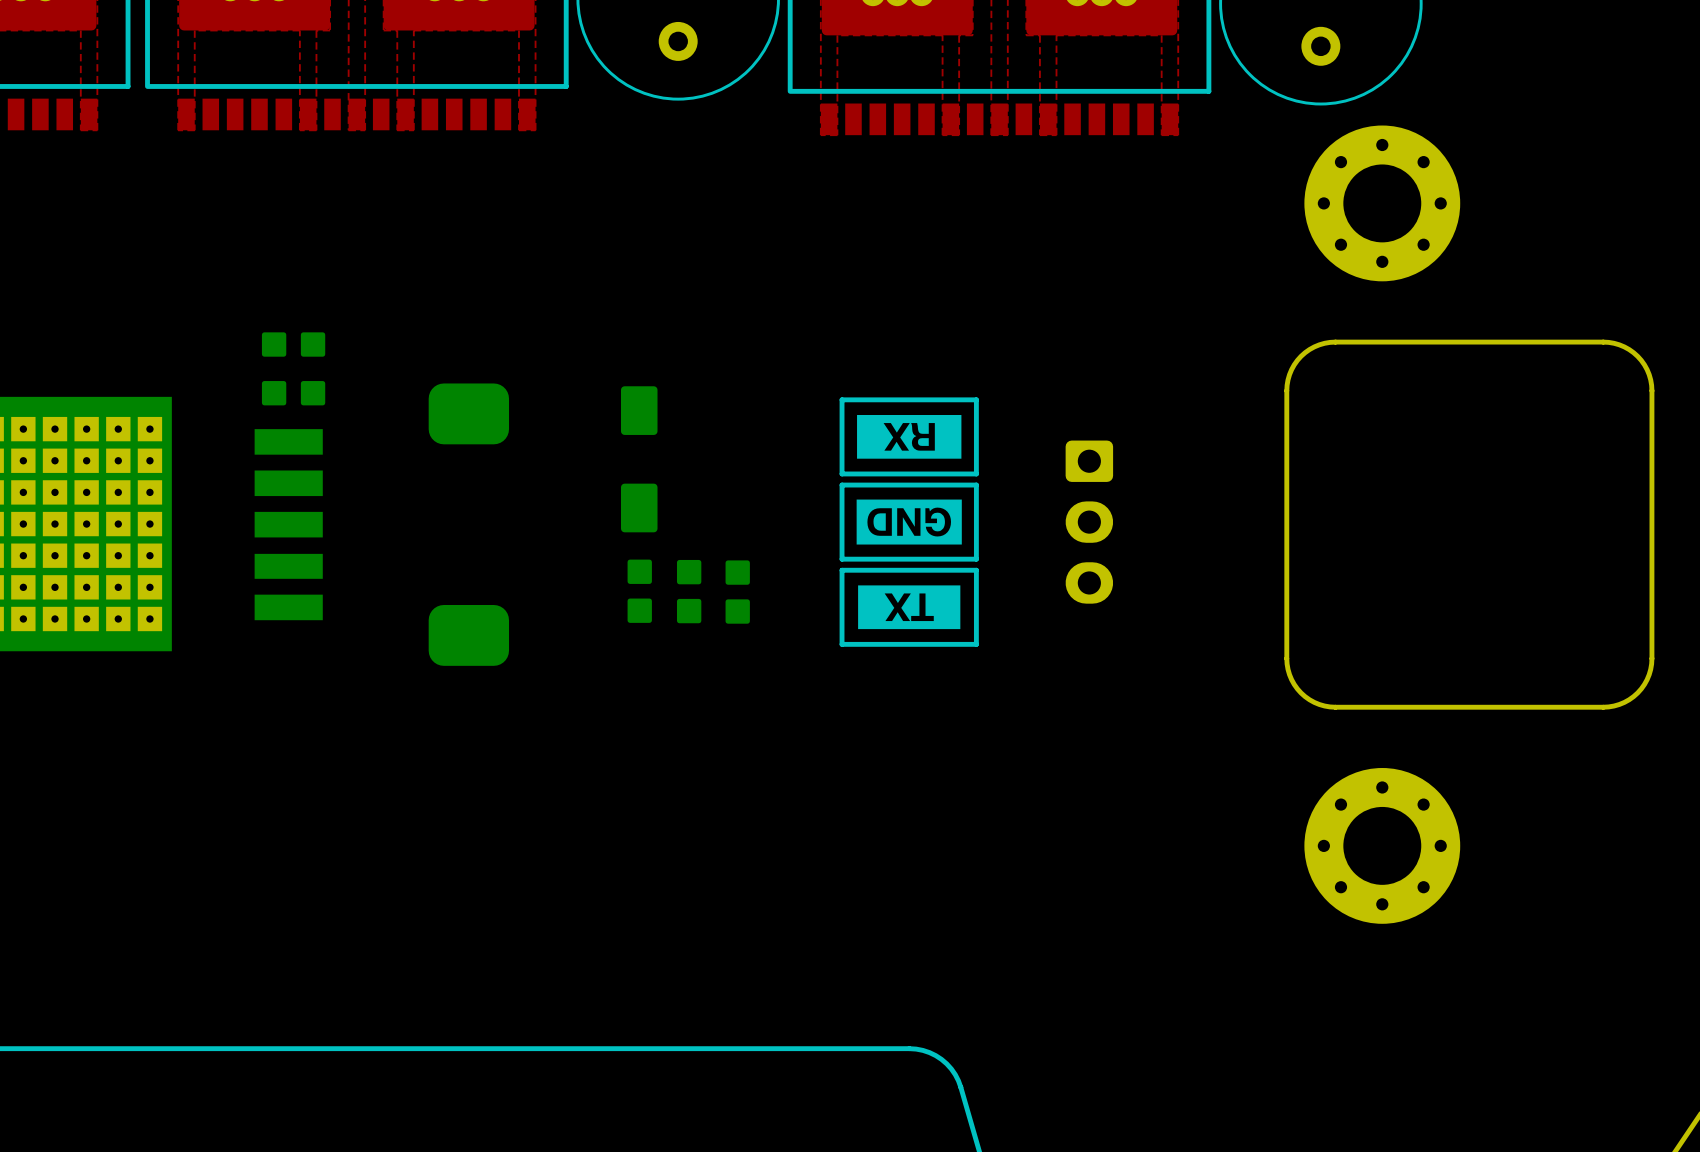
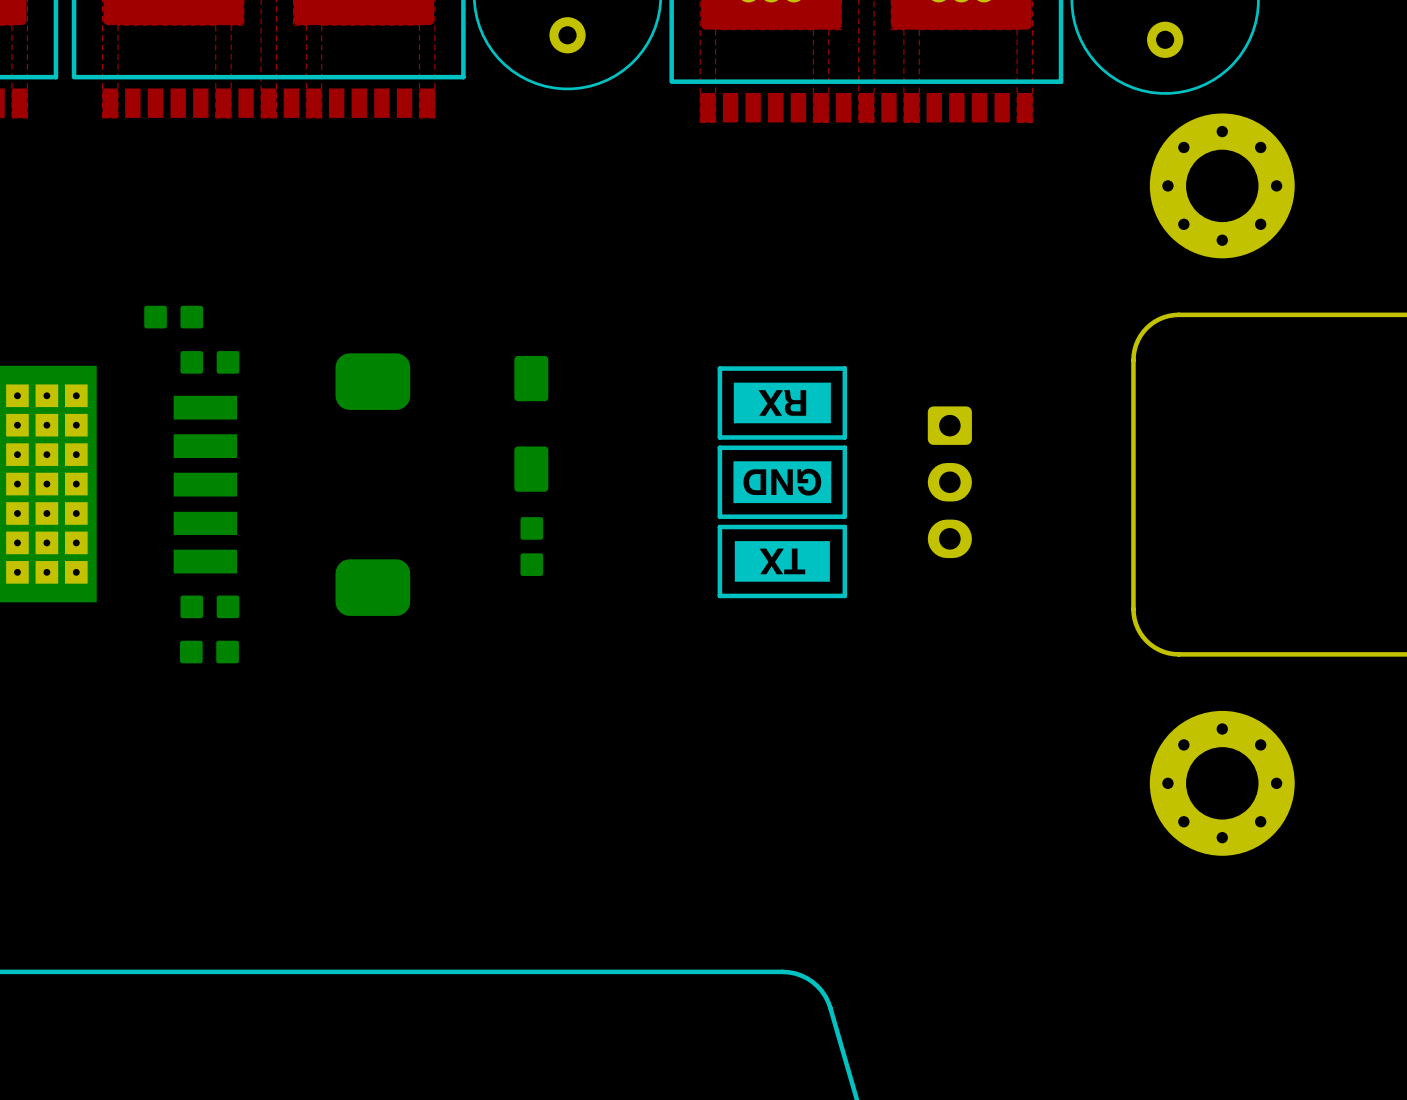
part position: (293, 344) -> (173, 317)
part: (689, 591) -> none
part: (737, 592) -> none
part: none -> (209, 606)
part: none -> (209, 652)

